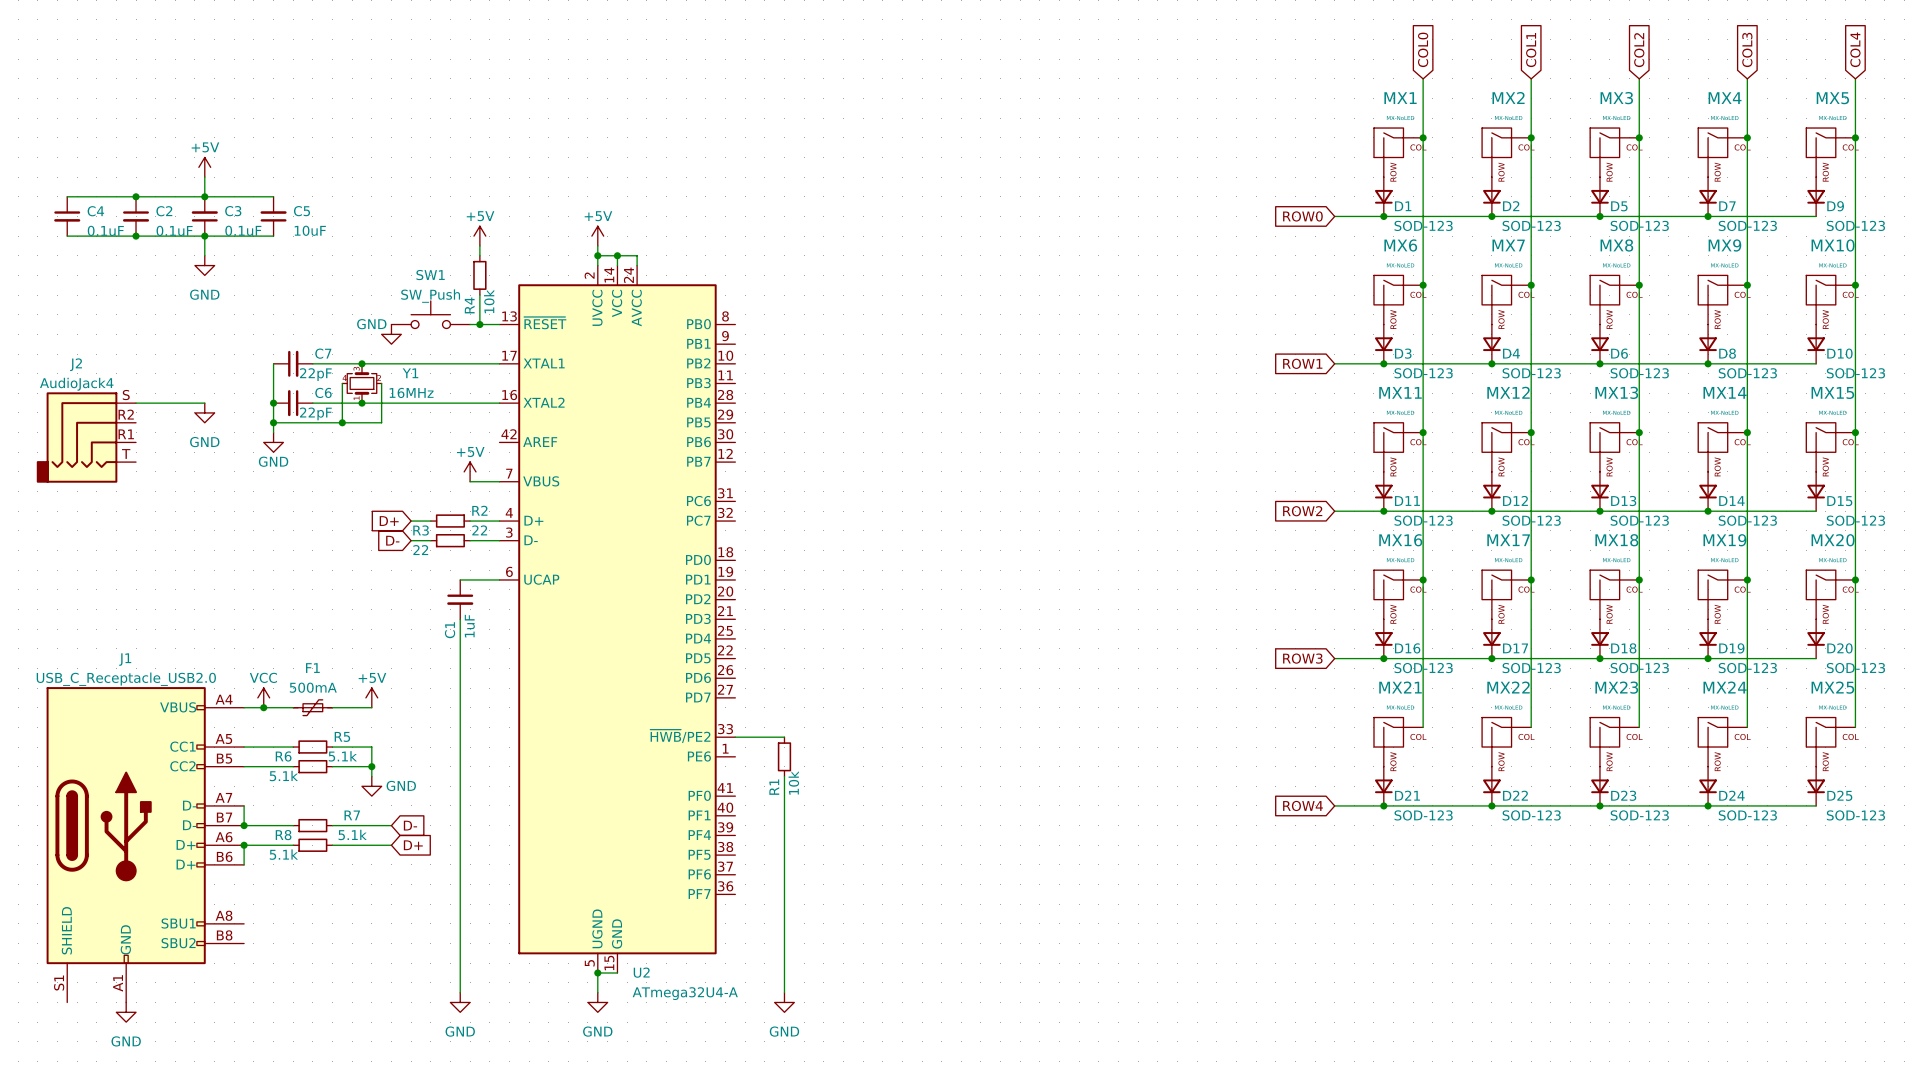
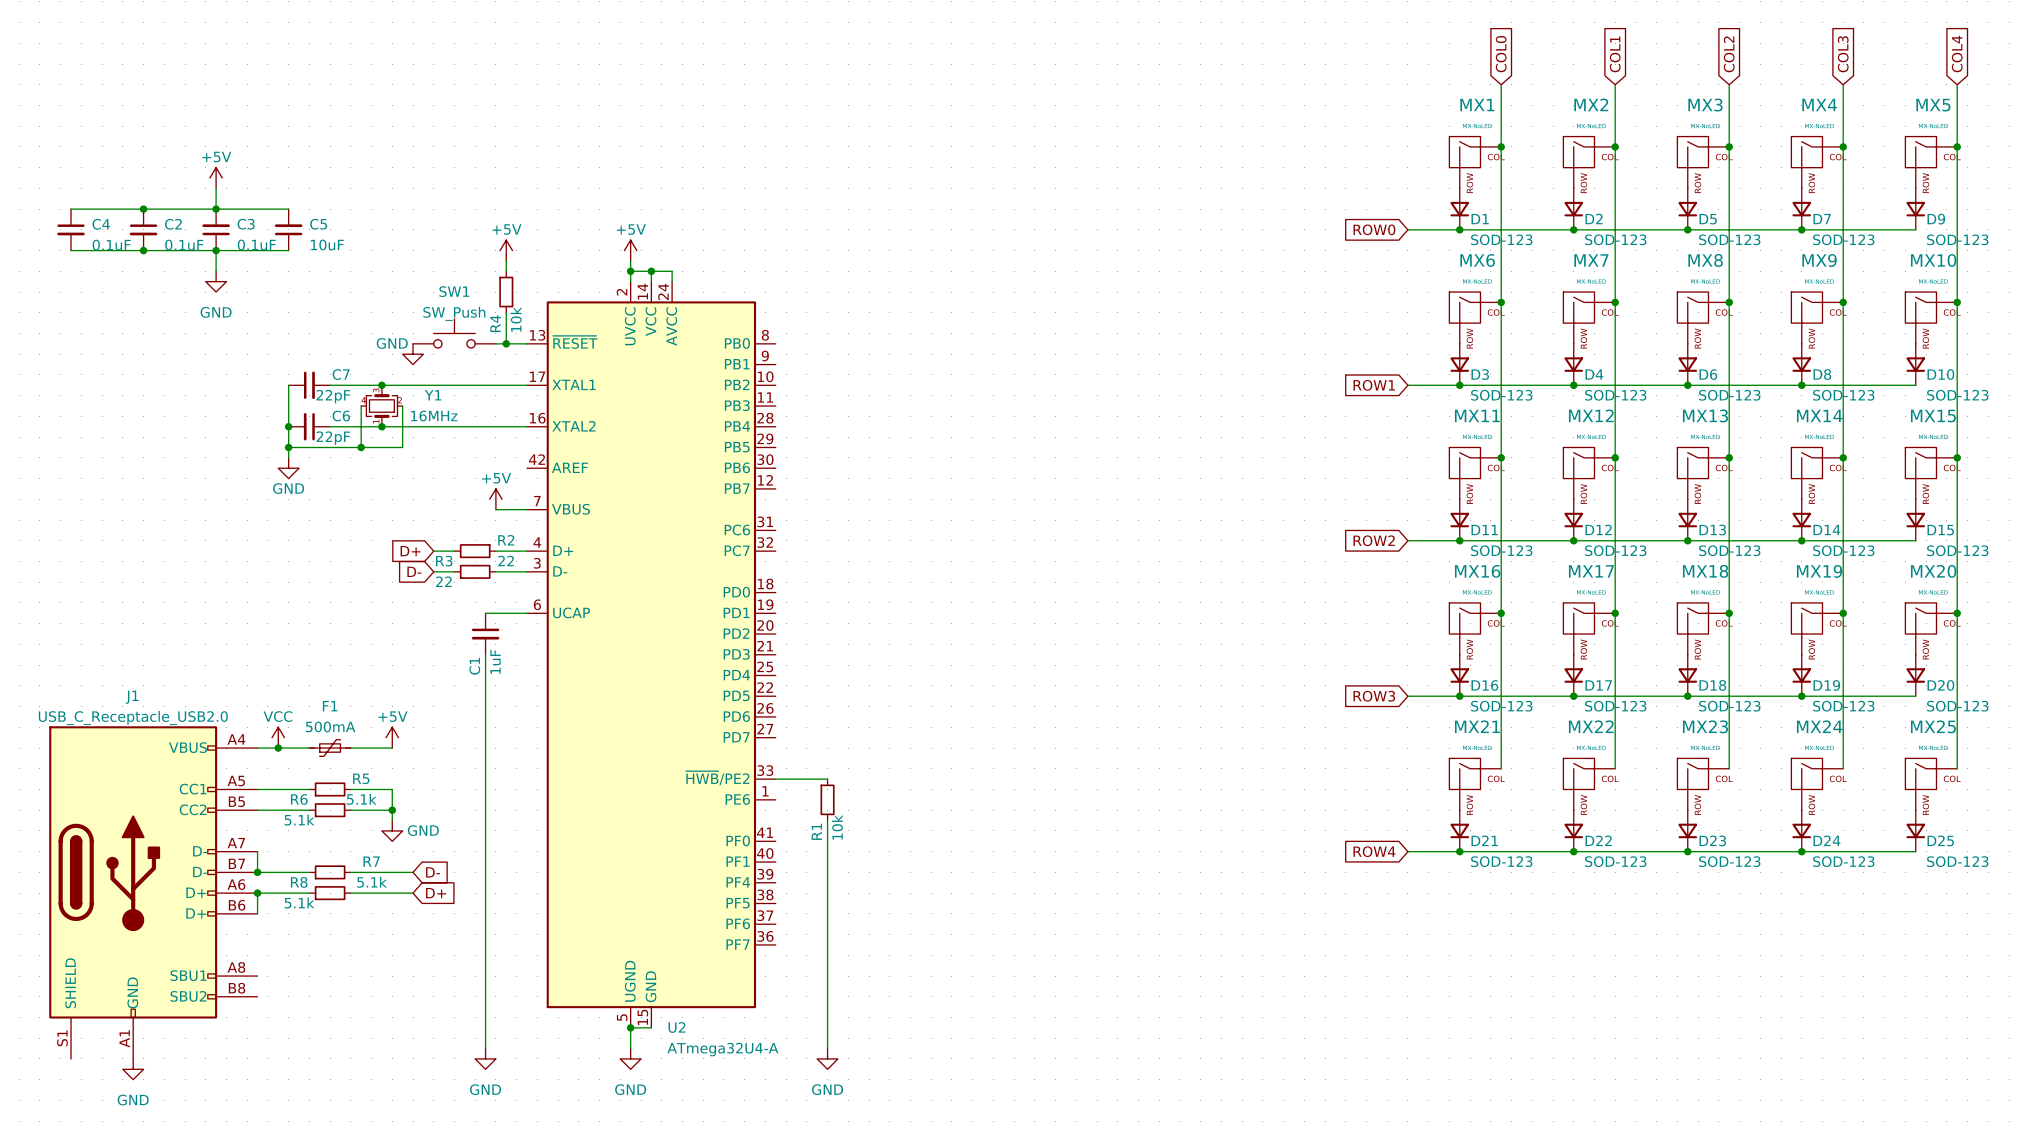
wire: (136, 403) (204, 403) -> none
power symbol: GND (204, 412) -> none
J2: AudioJack4 (86, 437) -> none

